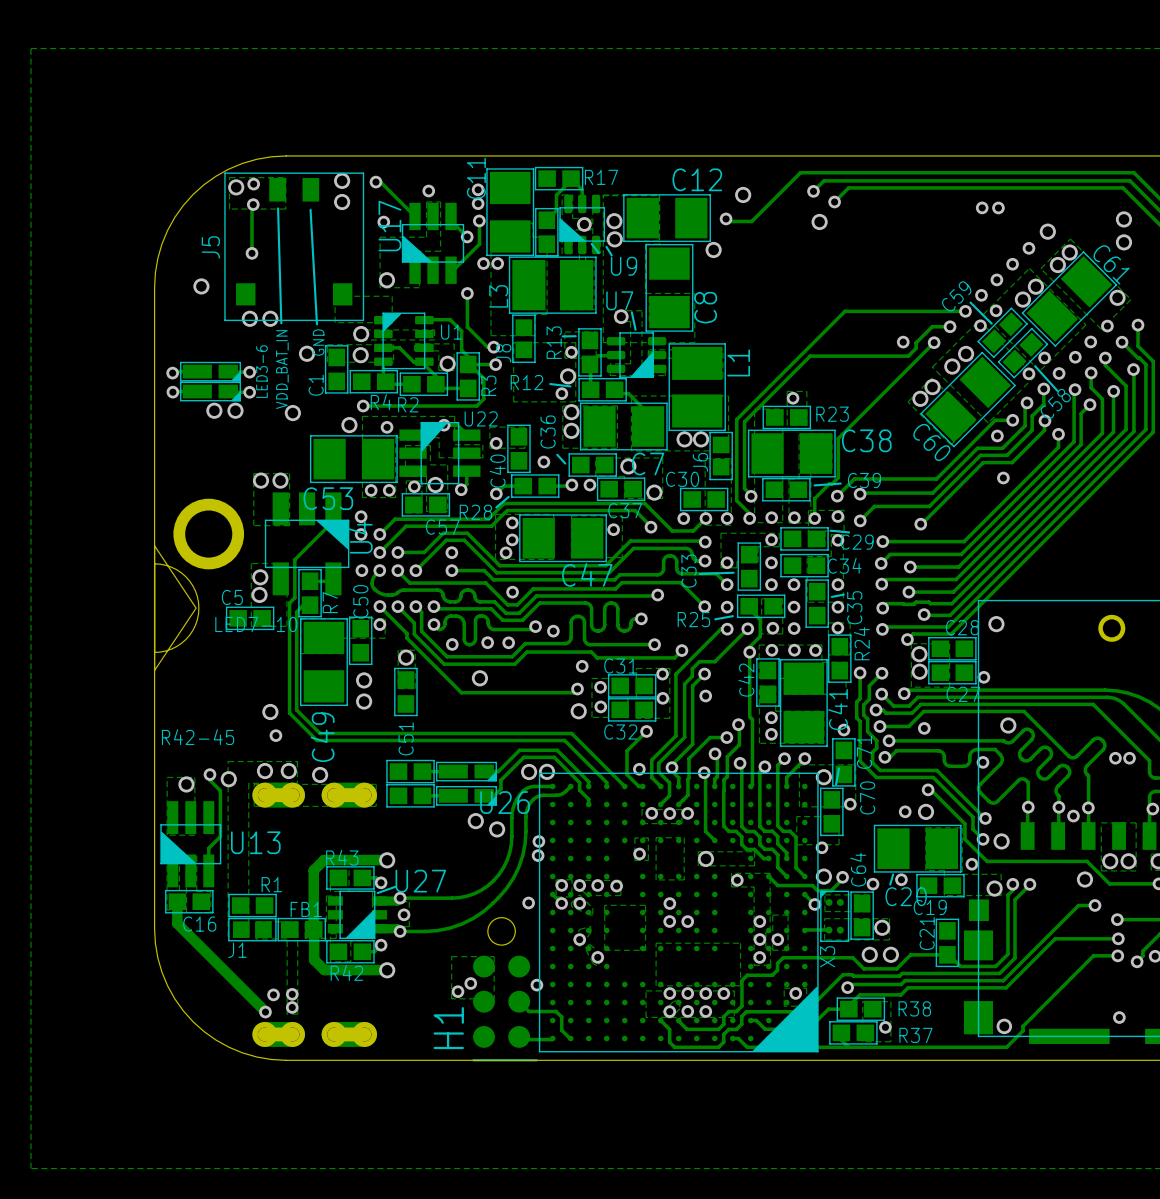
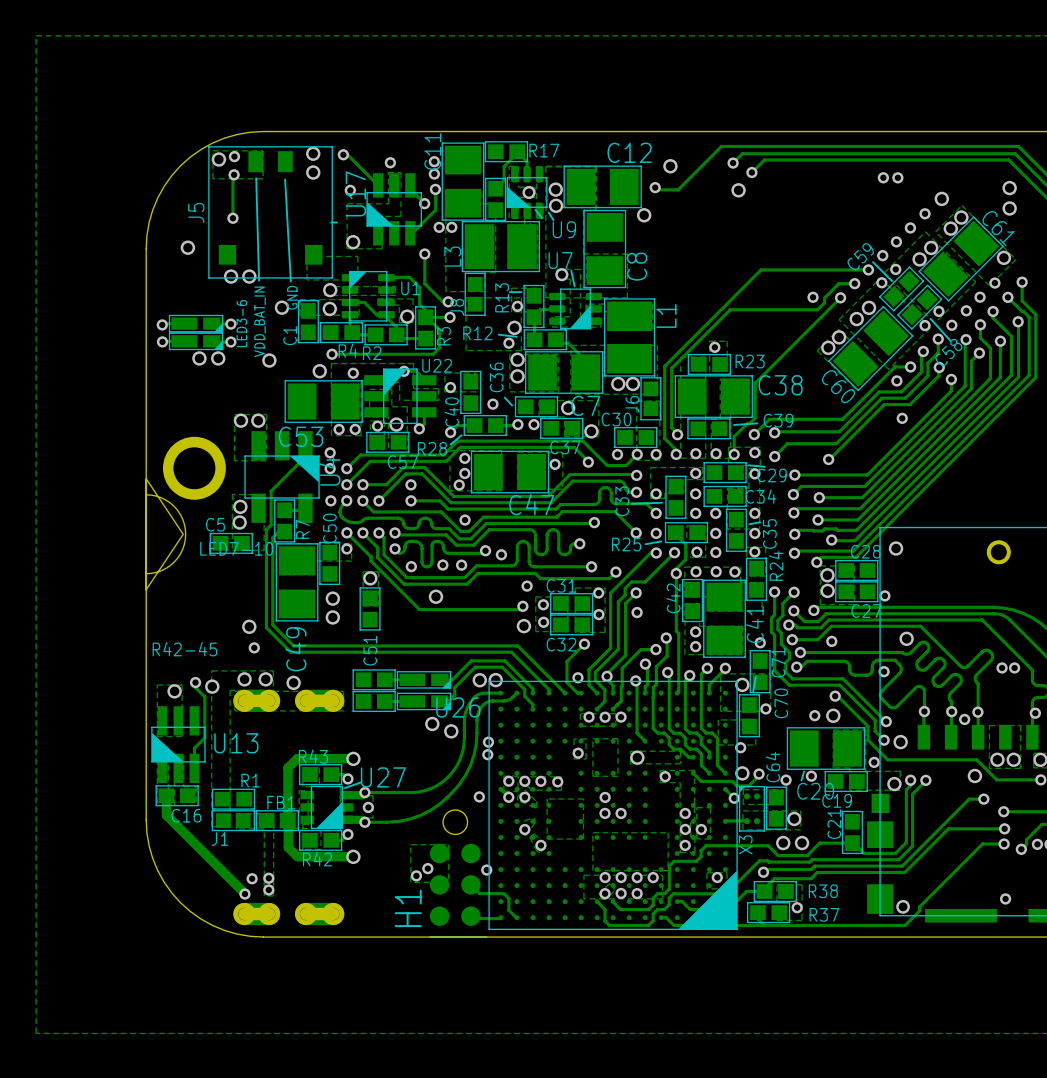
line: none -> (337, 222) (331, 222)

